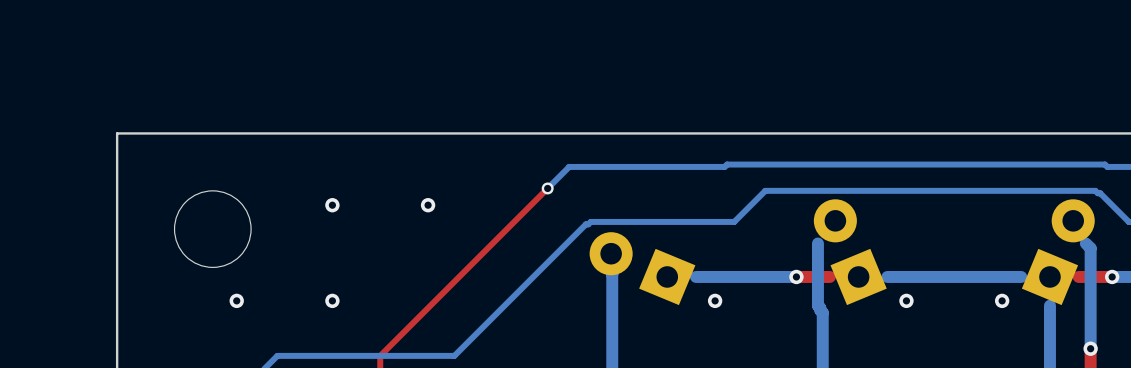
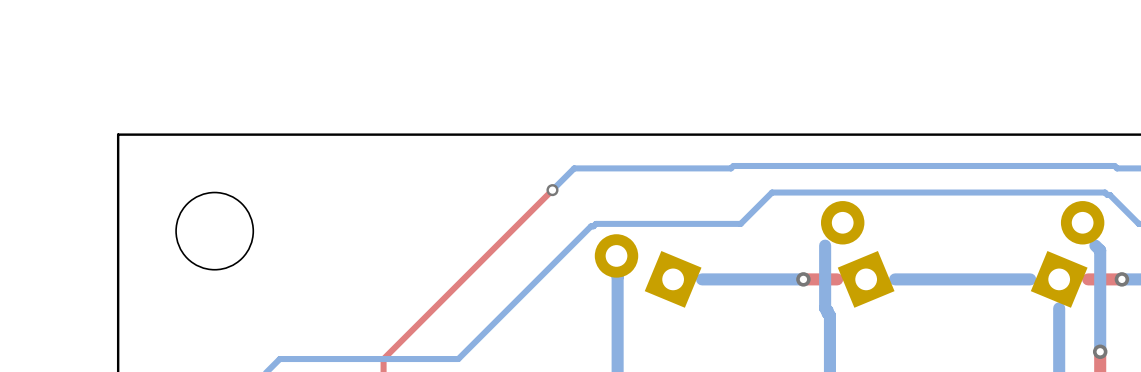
via: (332, 205) -> none
via: (428, 205) -> none
via: (236, 300) -> none
via: (332, 300) -> none
via: (715, 300) -> none
via: (906, 300) -> none
via: (1002, 300) -> none

